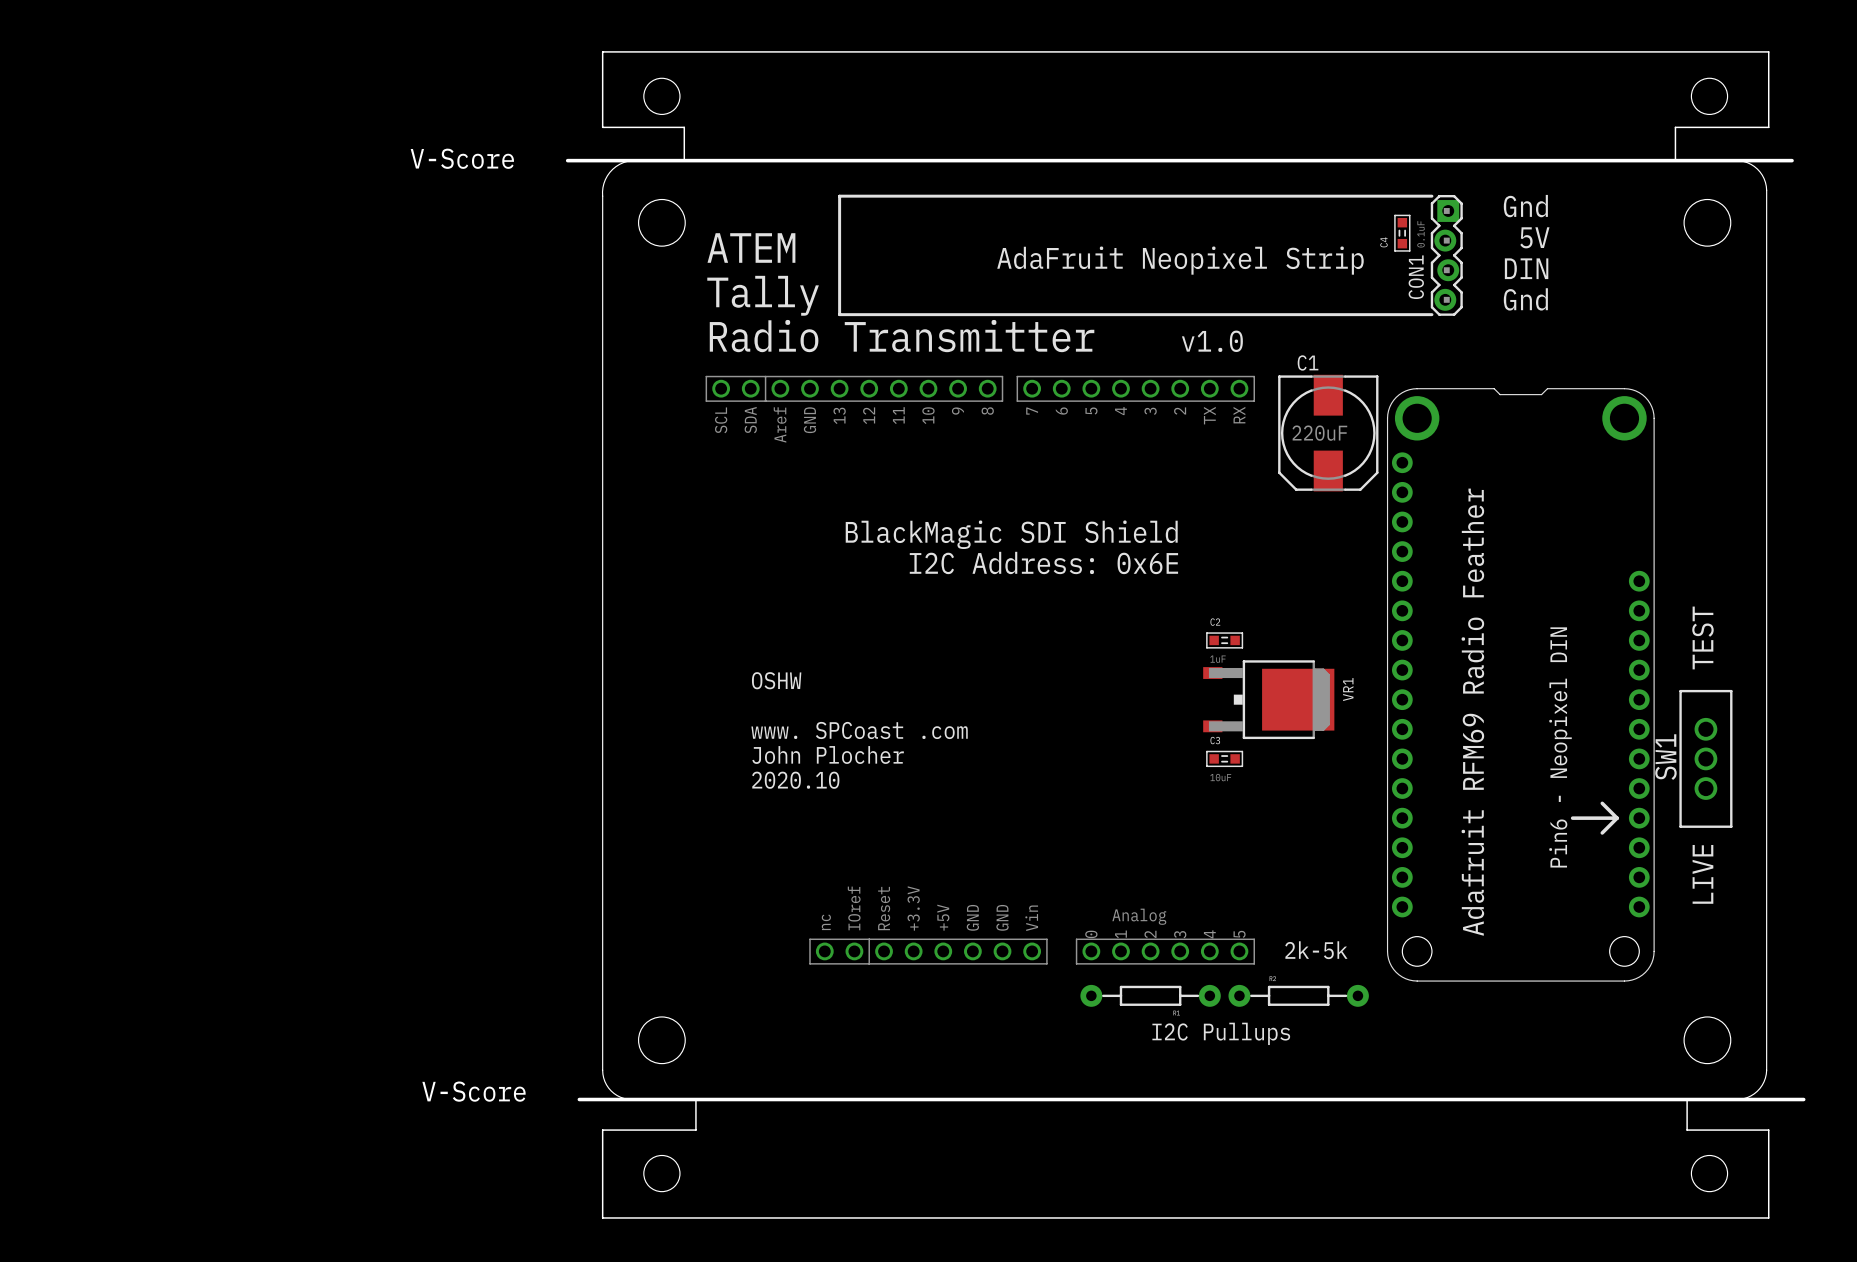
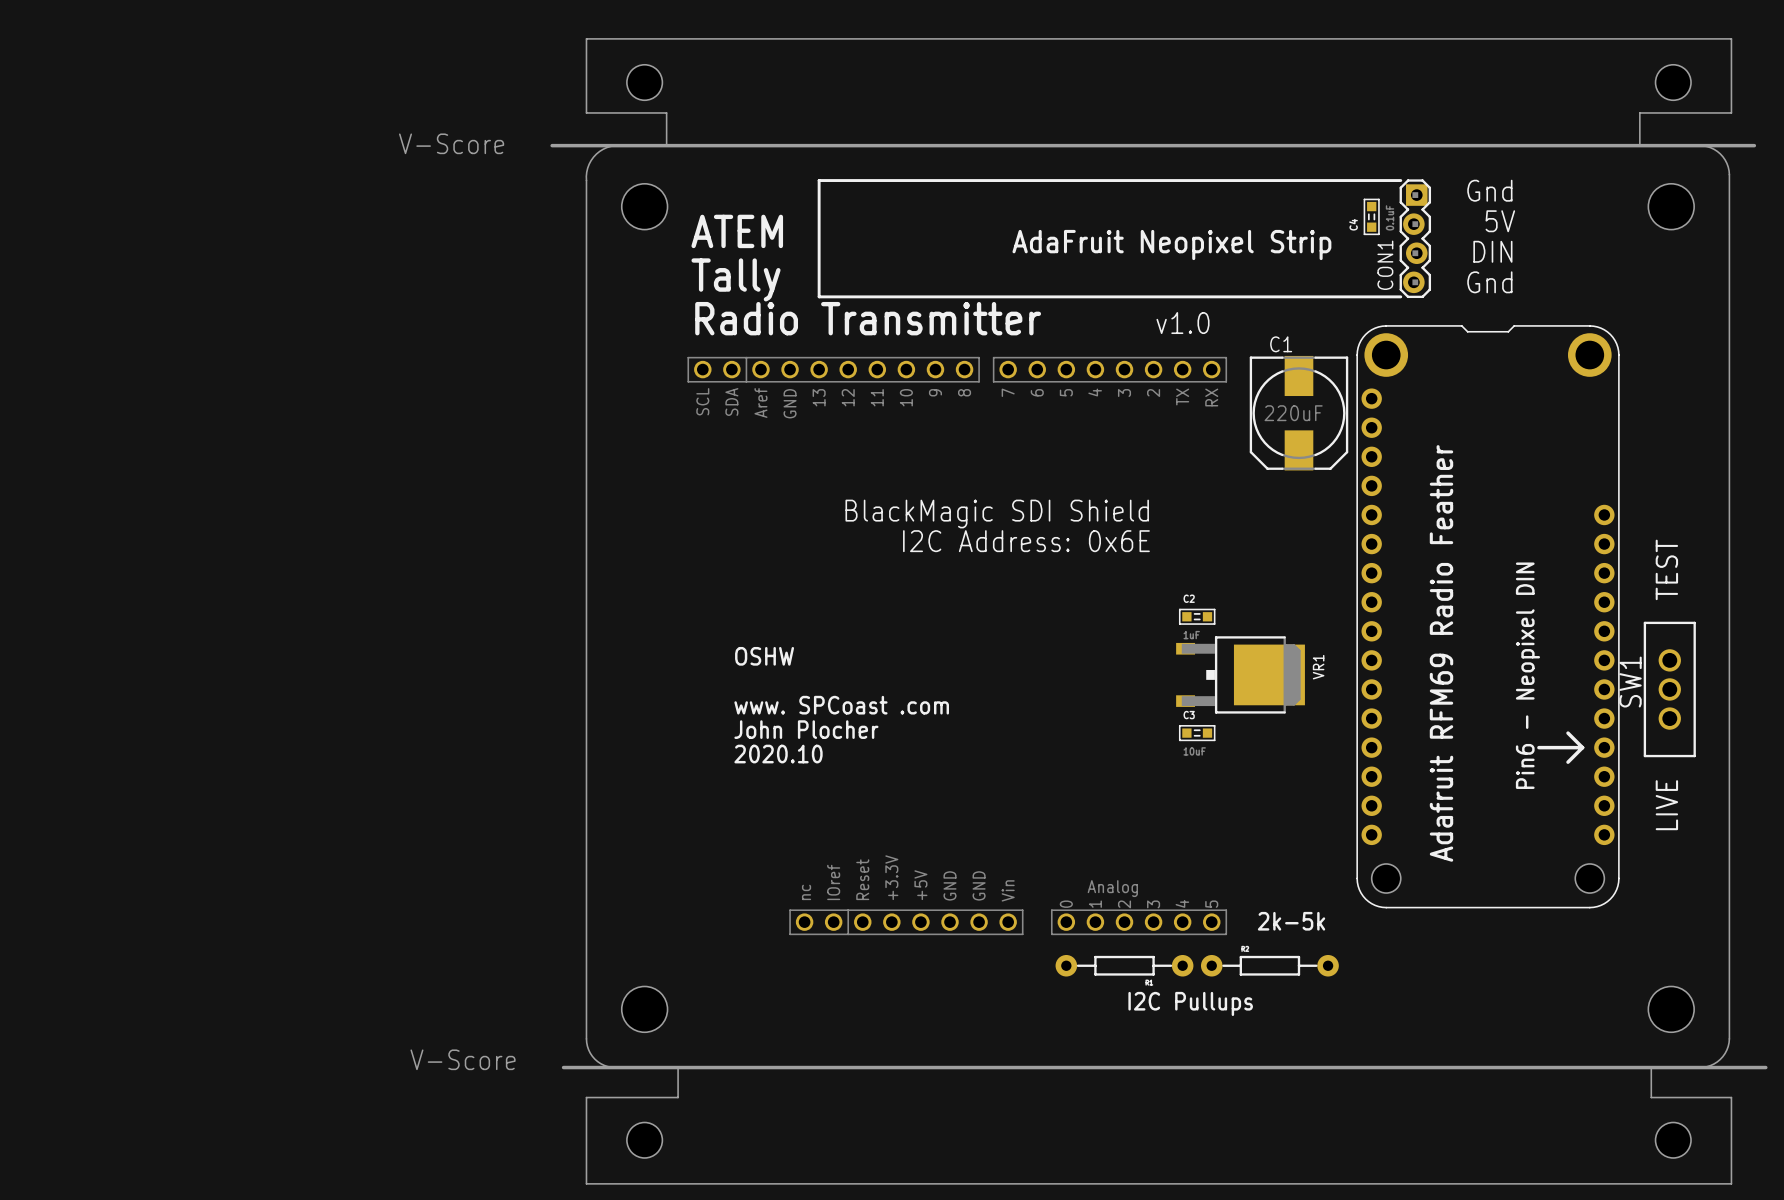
text position: TEST (1702, 637) -> TEST (1666, 569)
part position: (1520, 684) -> (1488, 616)
text position: Adafruit RFM69 Radio Feather (1472, 712) -> Adafruit RFM69 Radio Feather (1441, 653)
text position: Pin6 - Neopixel DIN (1560, 747) -> Pin6 - Neopixel DIN (1527, 675)
SW1 position: (1705, 758) -> (1669, 689)
line: (1602, 803) (1617, 818) -> (1568, 733) (1582, 747)
line: (1572, 818) (1617, 818) -> (1538, 747) (1582, 747)
line: (1617, 818) (1602, 832) -> (1582, 747) (1568, 762)
text position: LIVE (1702, 874) -> LIVE (1666, 805)

